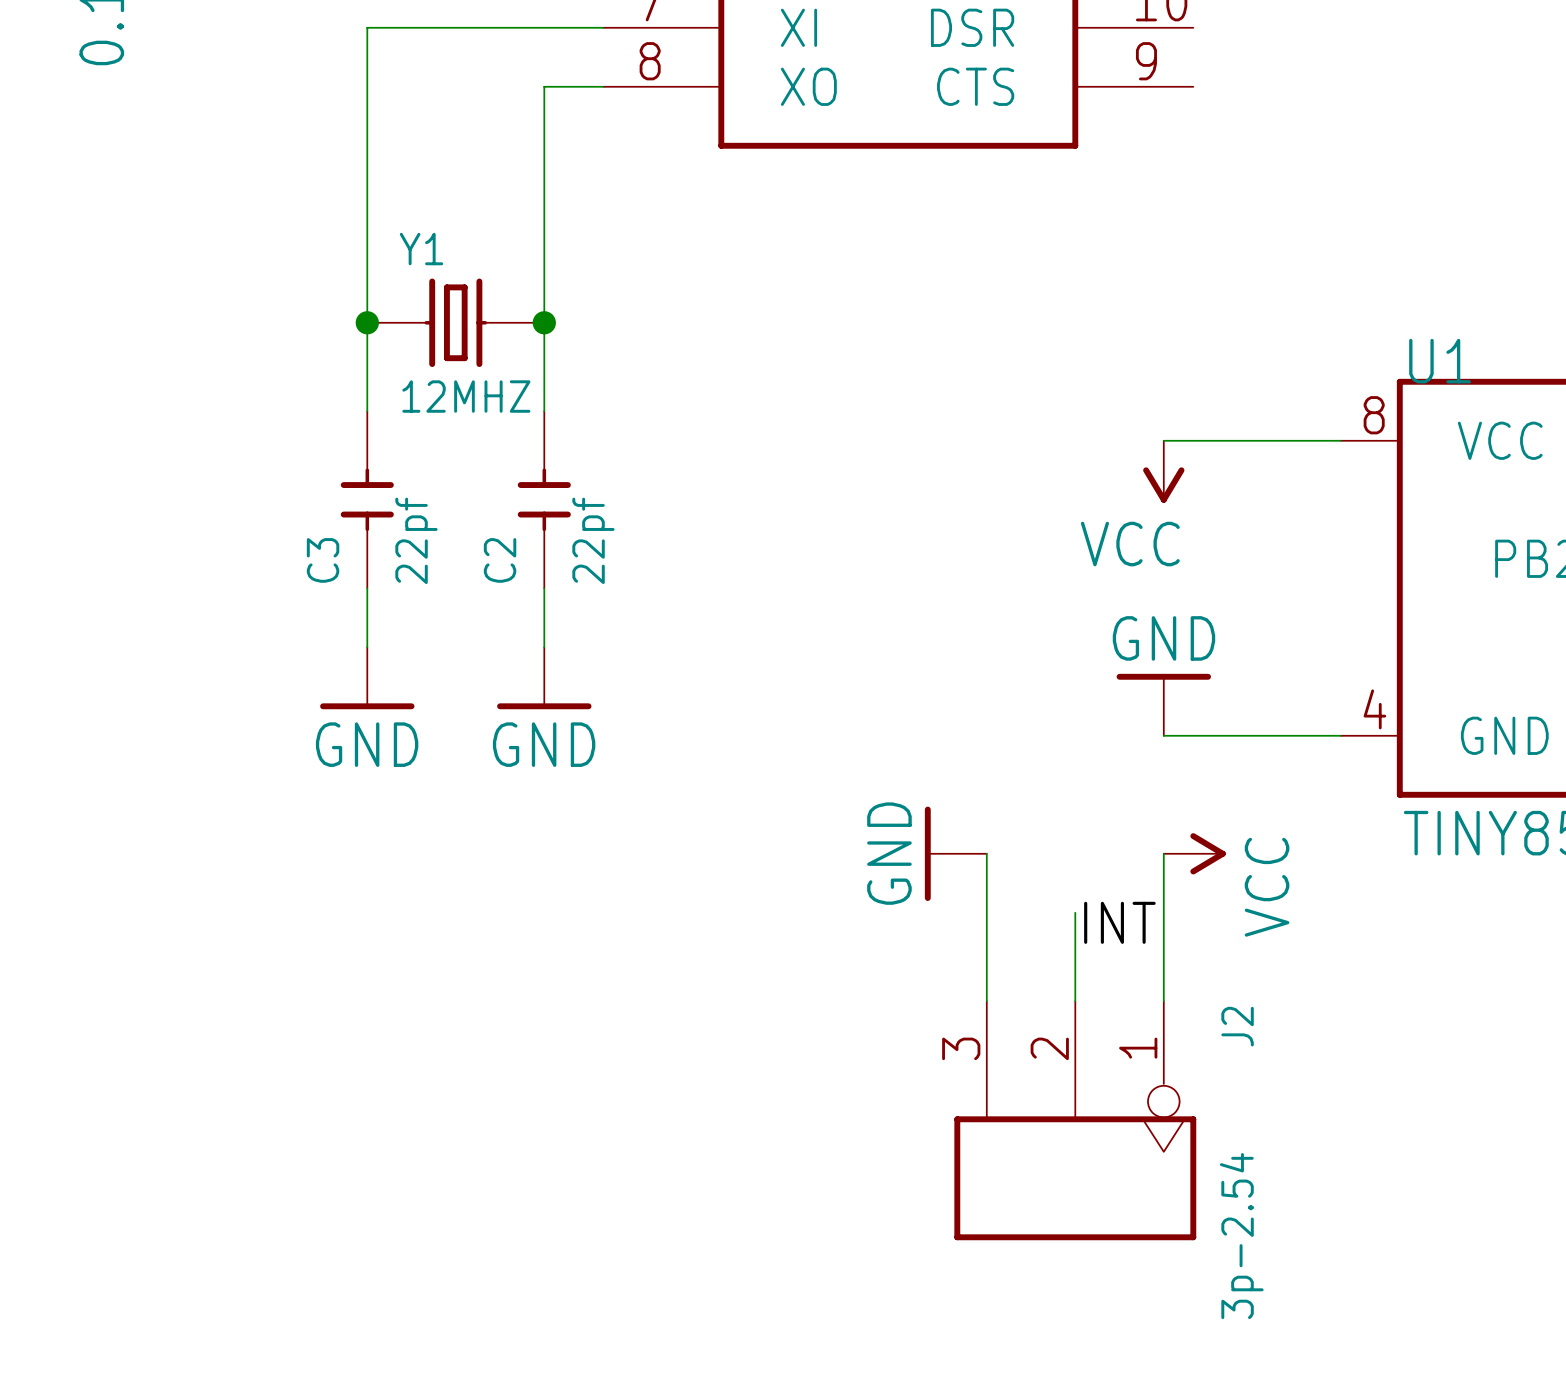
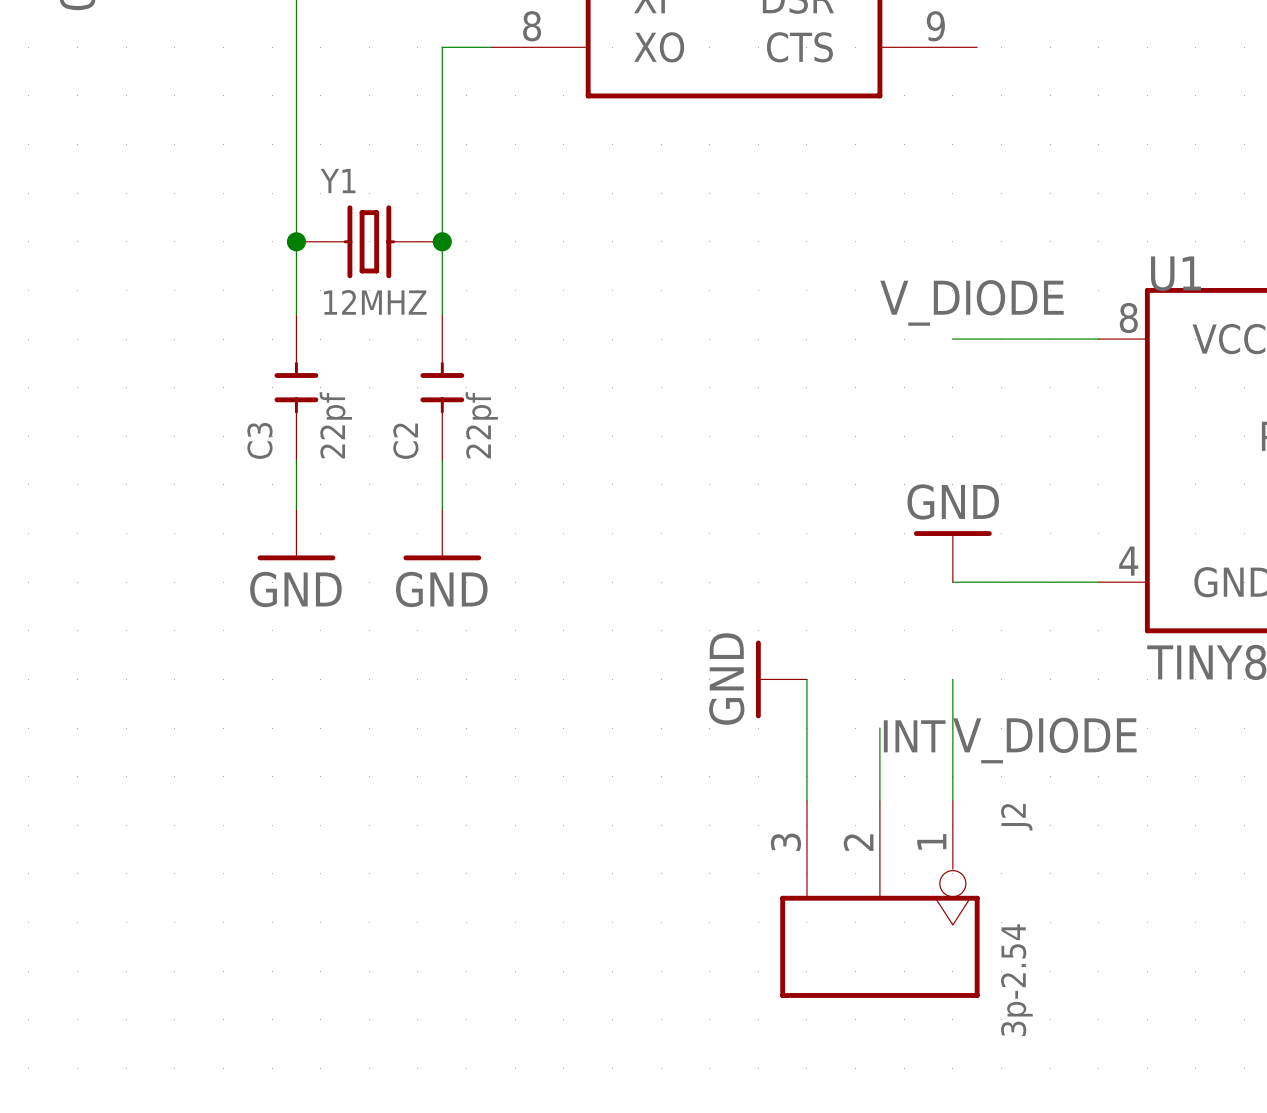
label: none -> V_DIODE (971, 302)
power symbol: VCC (1163, 471) -> none
power symbol: VCC (1194, 853) -> none
label: none -> V_DIODE (1044, 740)

